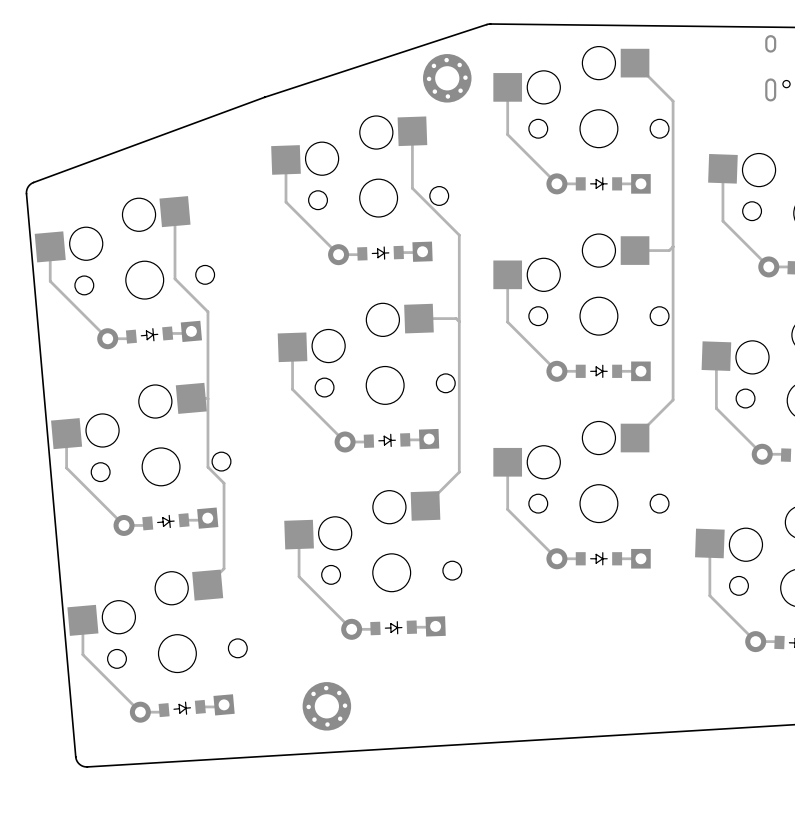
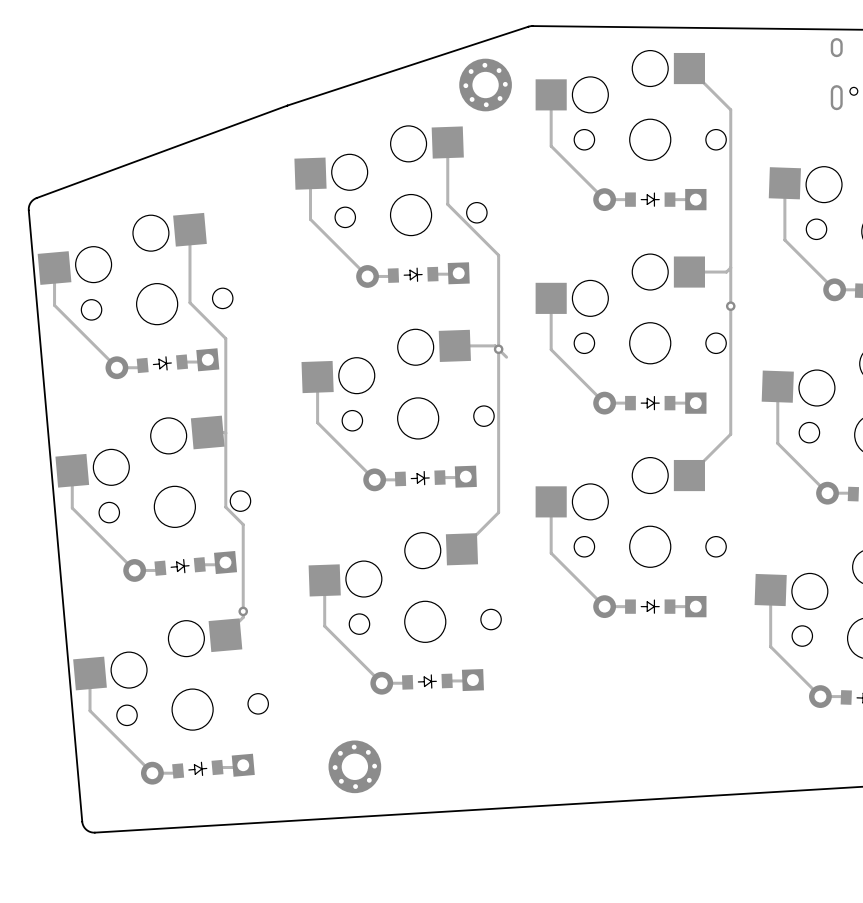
via: none -> (730, 306)
track: none -> (498, 349) (506, 357)
via: none -> (498, 349)
via: none -> (243, 611)

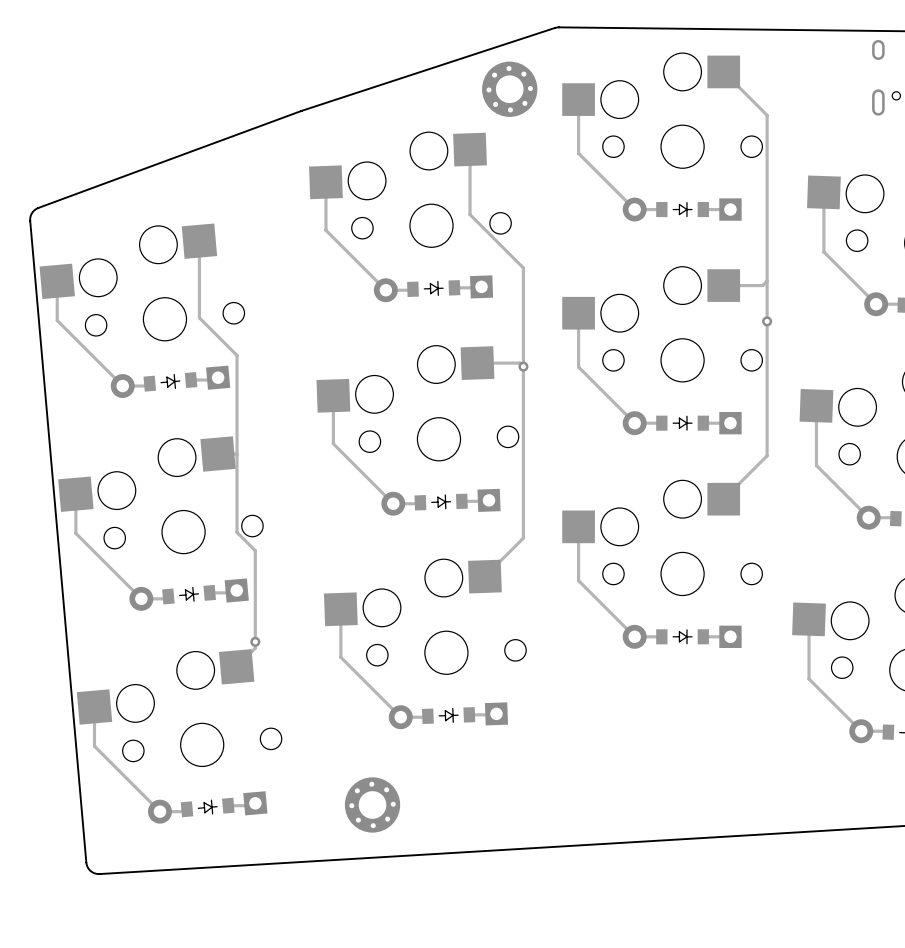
track: (498, 349) (506, 357) -> none

